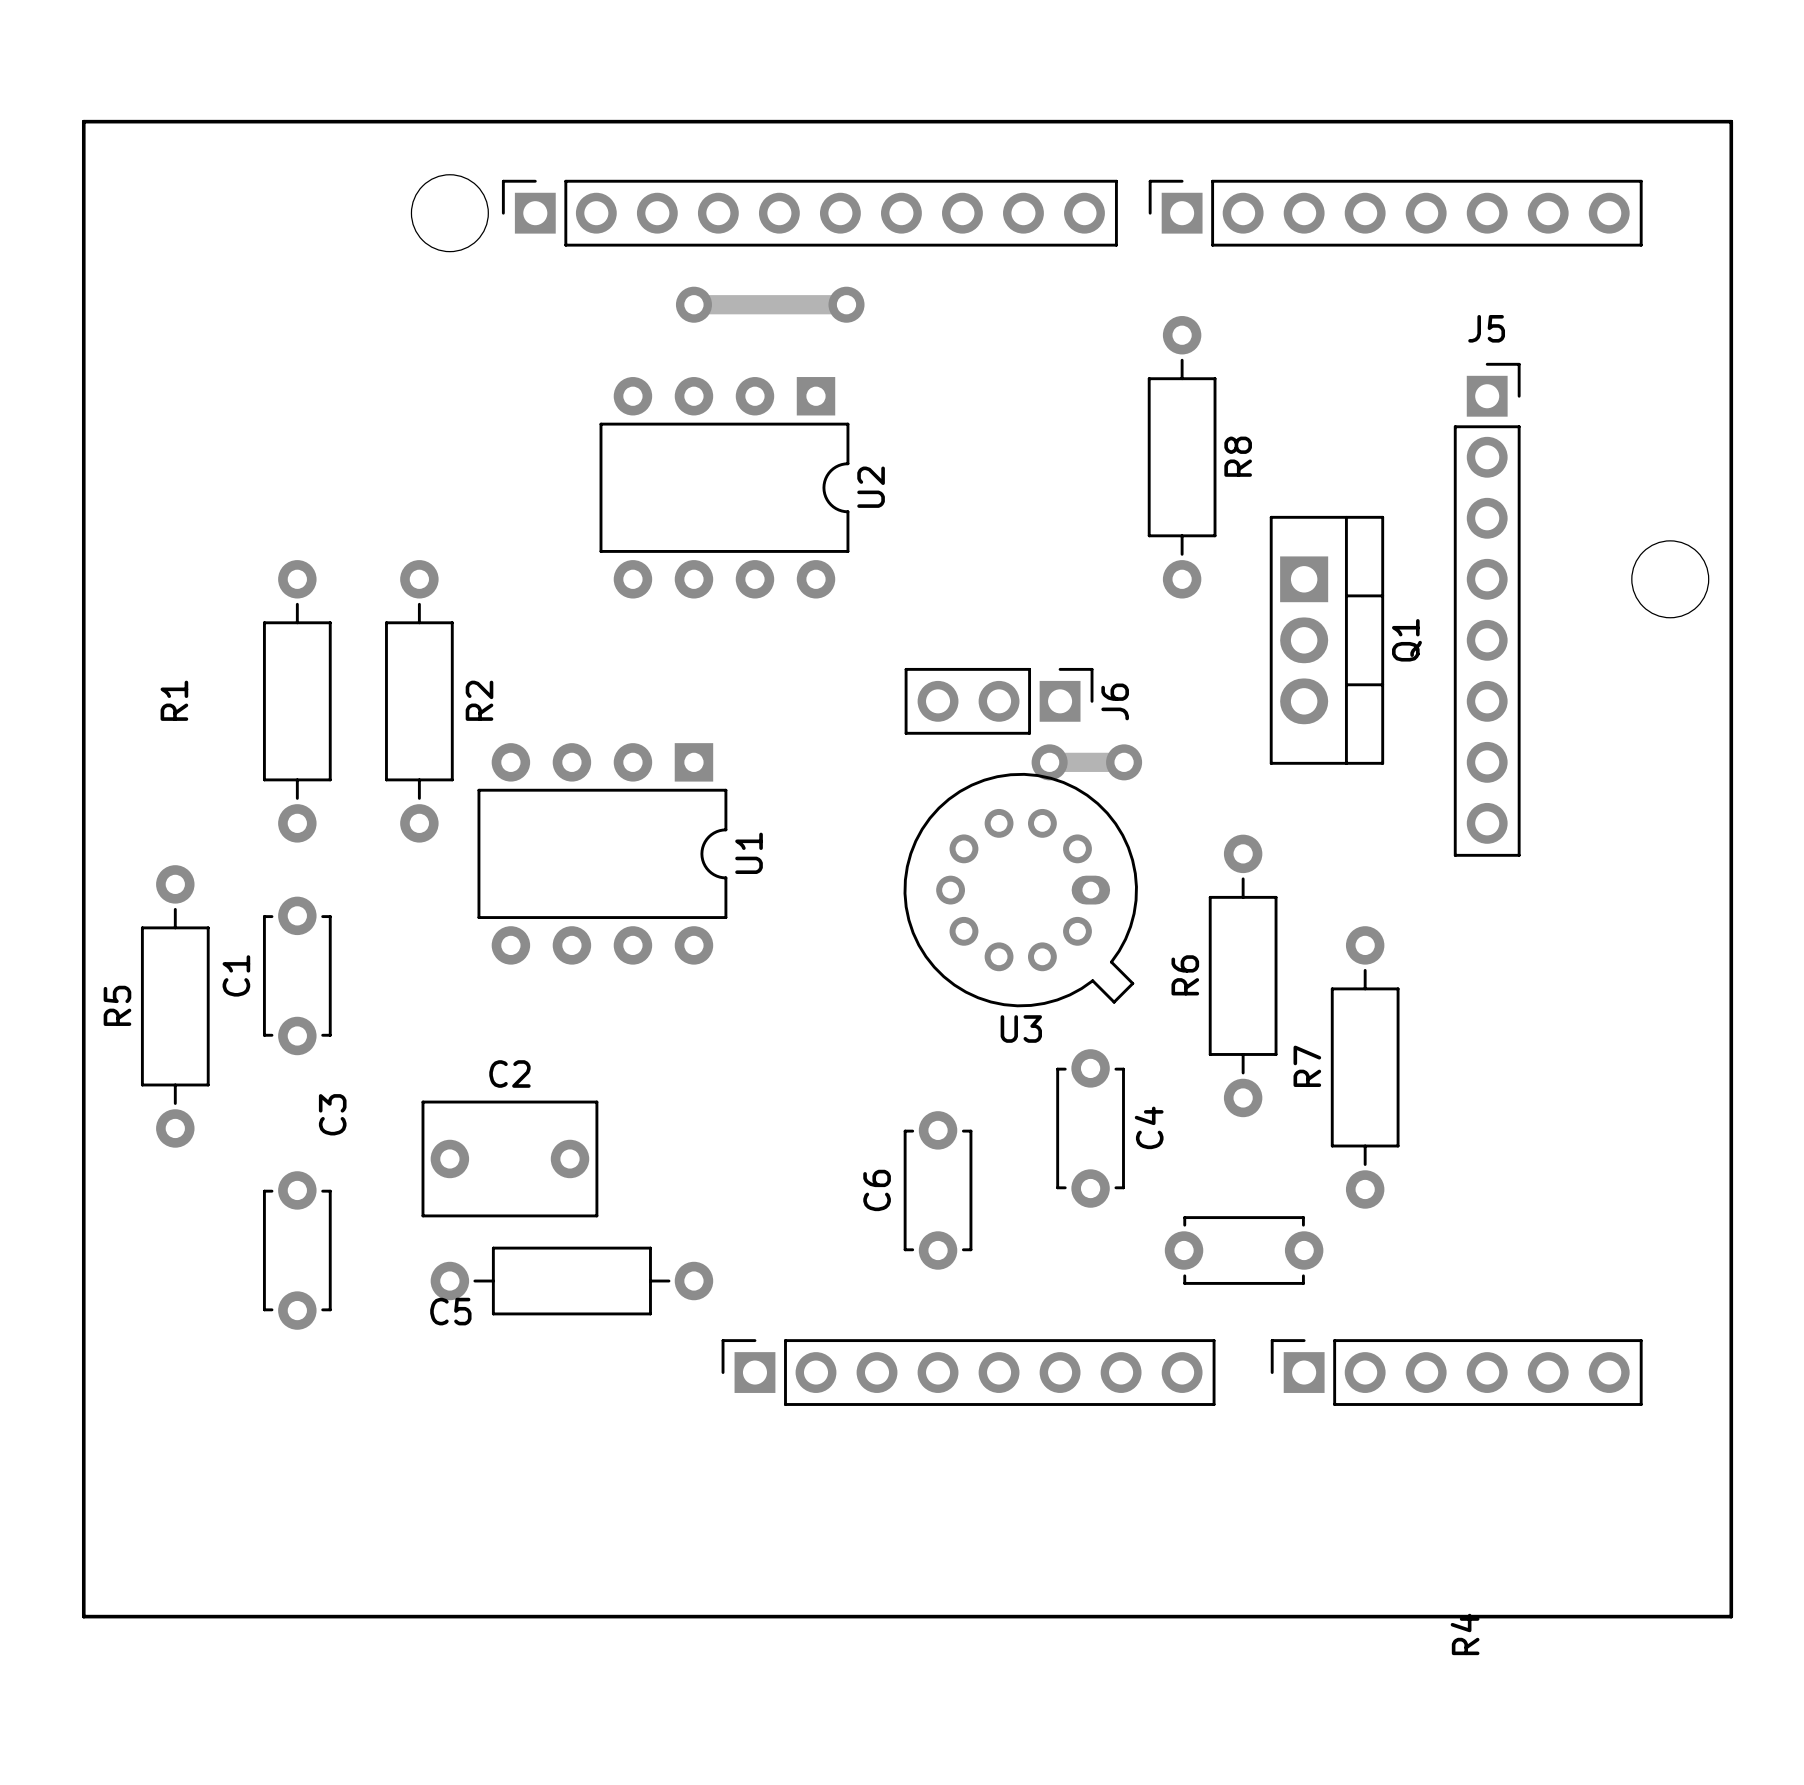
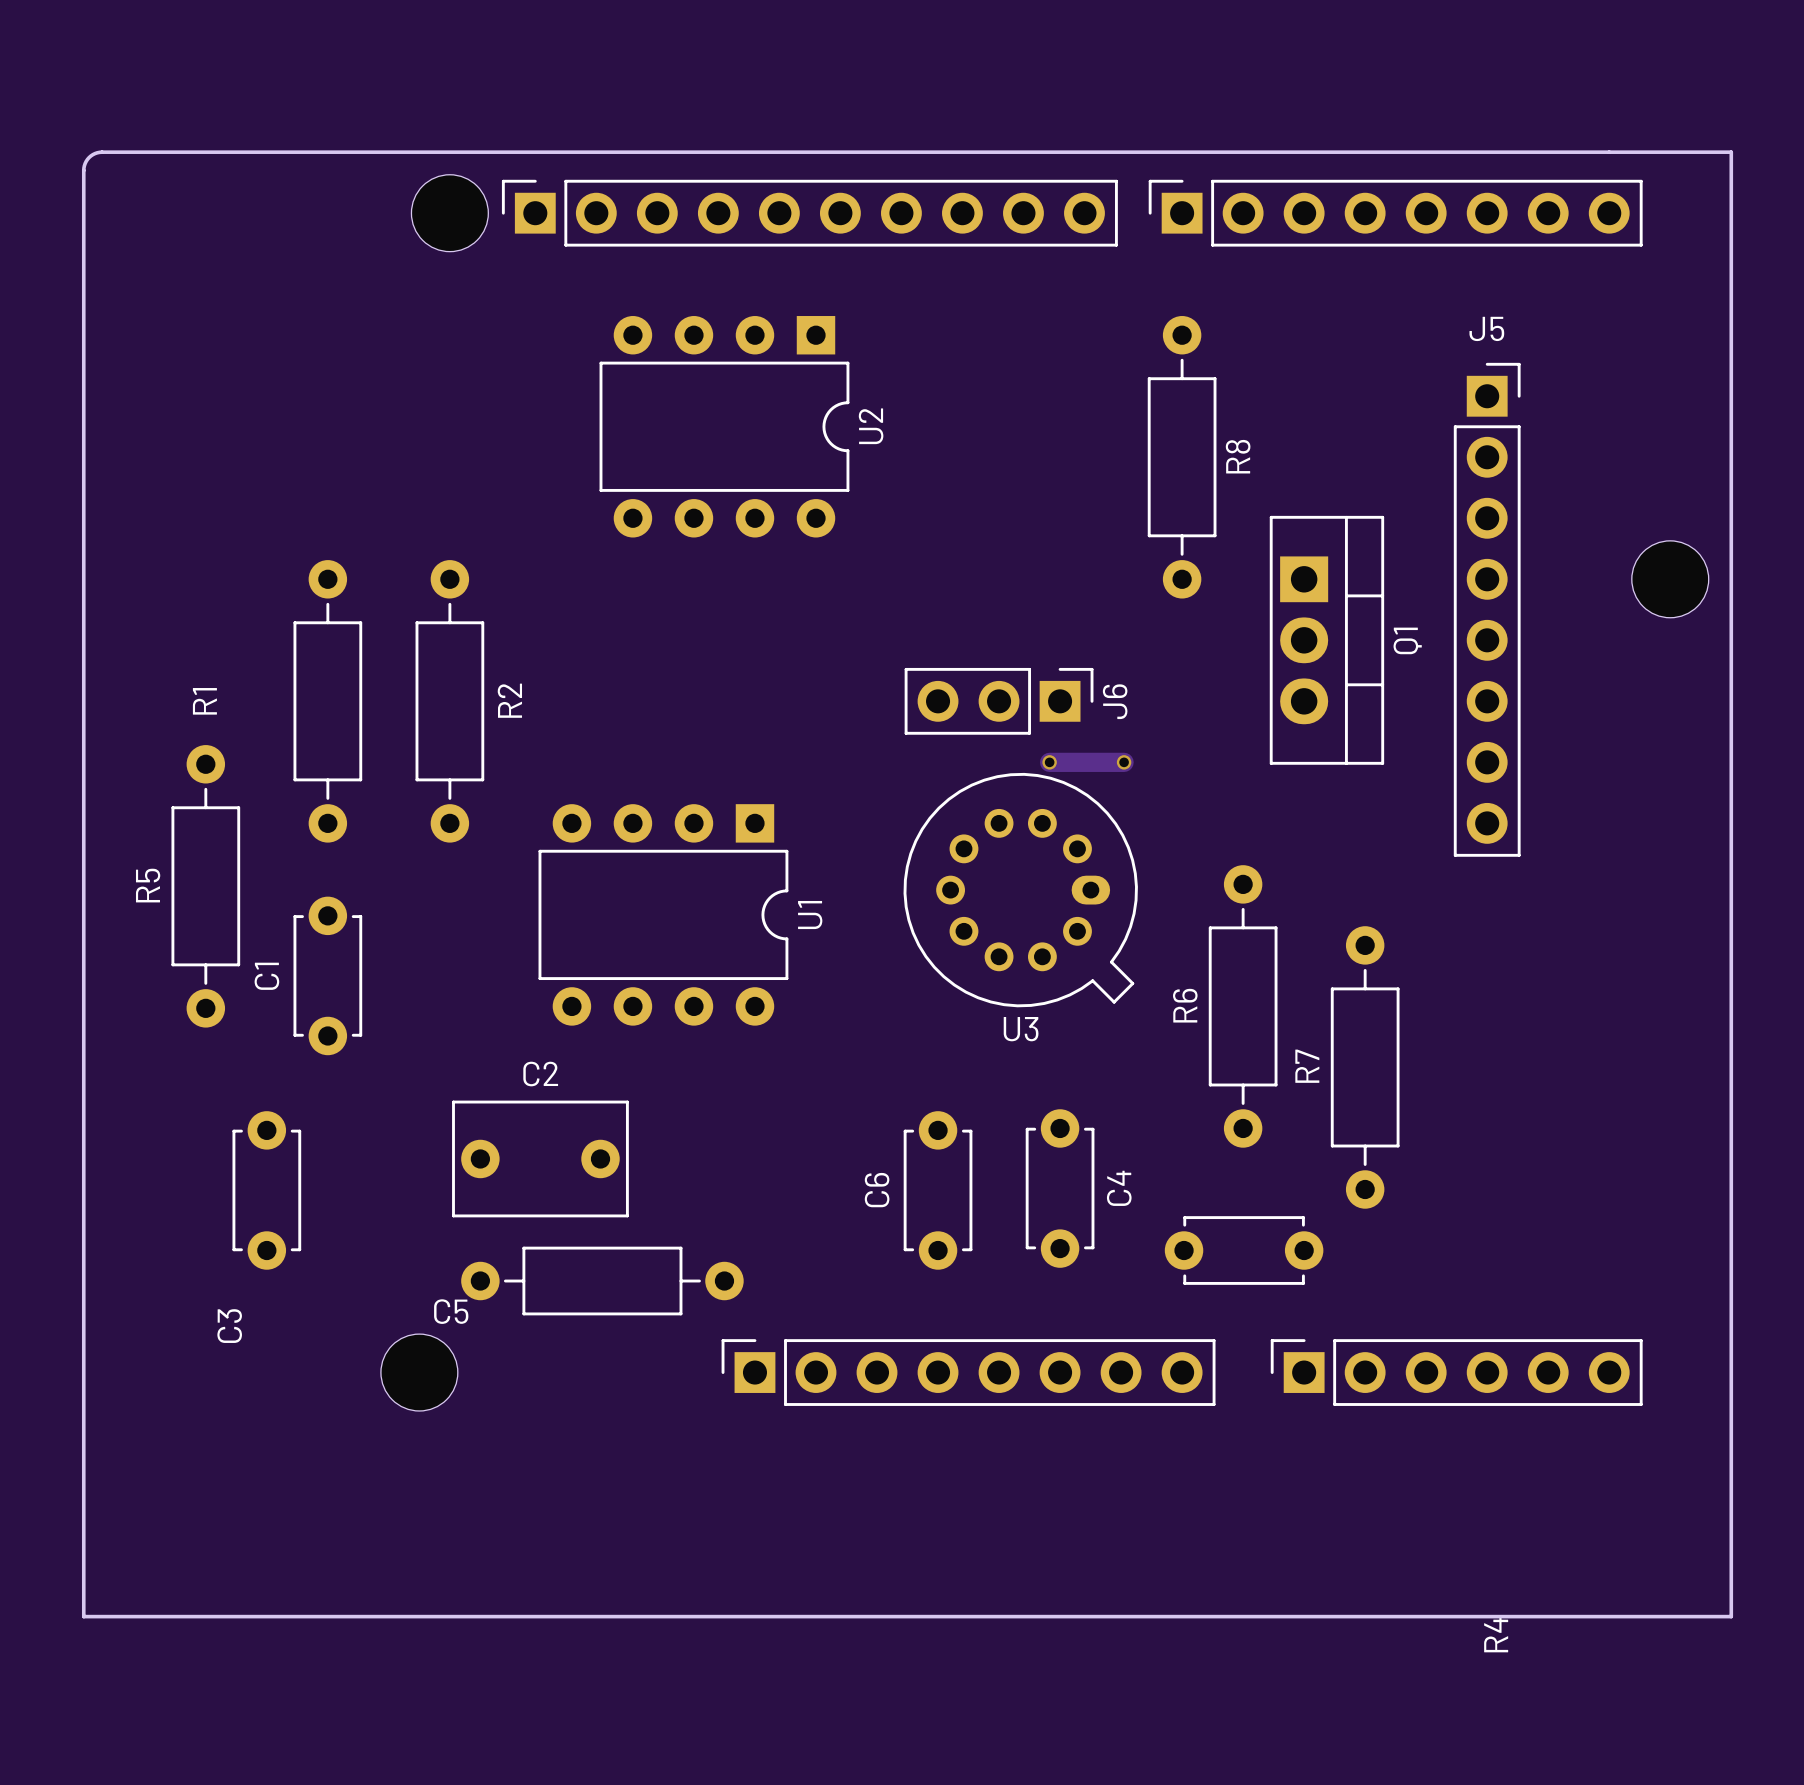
board edge: (1731, 152) (1731, 121) (83, 121) (83, 170) -> (1731, 152) (102, 152) (89, 157) (83, 170)
track: (693, 304) (846, 304) -> none
via: (693, 304) -> none
via: (846, 304) -> none
U2 position: (724, 487) -> (724, 426)
R1 position: (297, 701) -> (327, 701)
R2 position: (419, 701) -> (449, 701)
via size: [1031, 744, 1068, 781] -> [1042, 755, 1057, 770]
via size: [1106, 744, 1143, 781] -> [1116, 755, 1132, 770]
U1 position: (602, 853) -> (663, 914)
C1 position: (297, 975) -> (327, 975)
R6 position: (1243, 975) -> (1243, 1006)
R5 position: (175, 1006) -> (205, 886)
C3 name position: C3 (332, 1114) -> C3 (229, 1326)
C4 position: (1090, 1128) -> (1060, 1188)
C2 position: (509, 1158) -> (540, 1158)
C3 position: (297, 1250) -> (266, 1190)
R4 position: (571, 1281) -> (602, 1281)
part: none -> (419, 1372)

